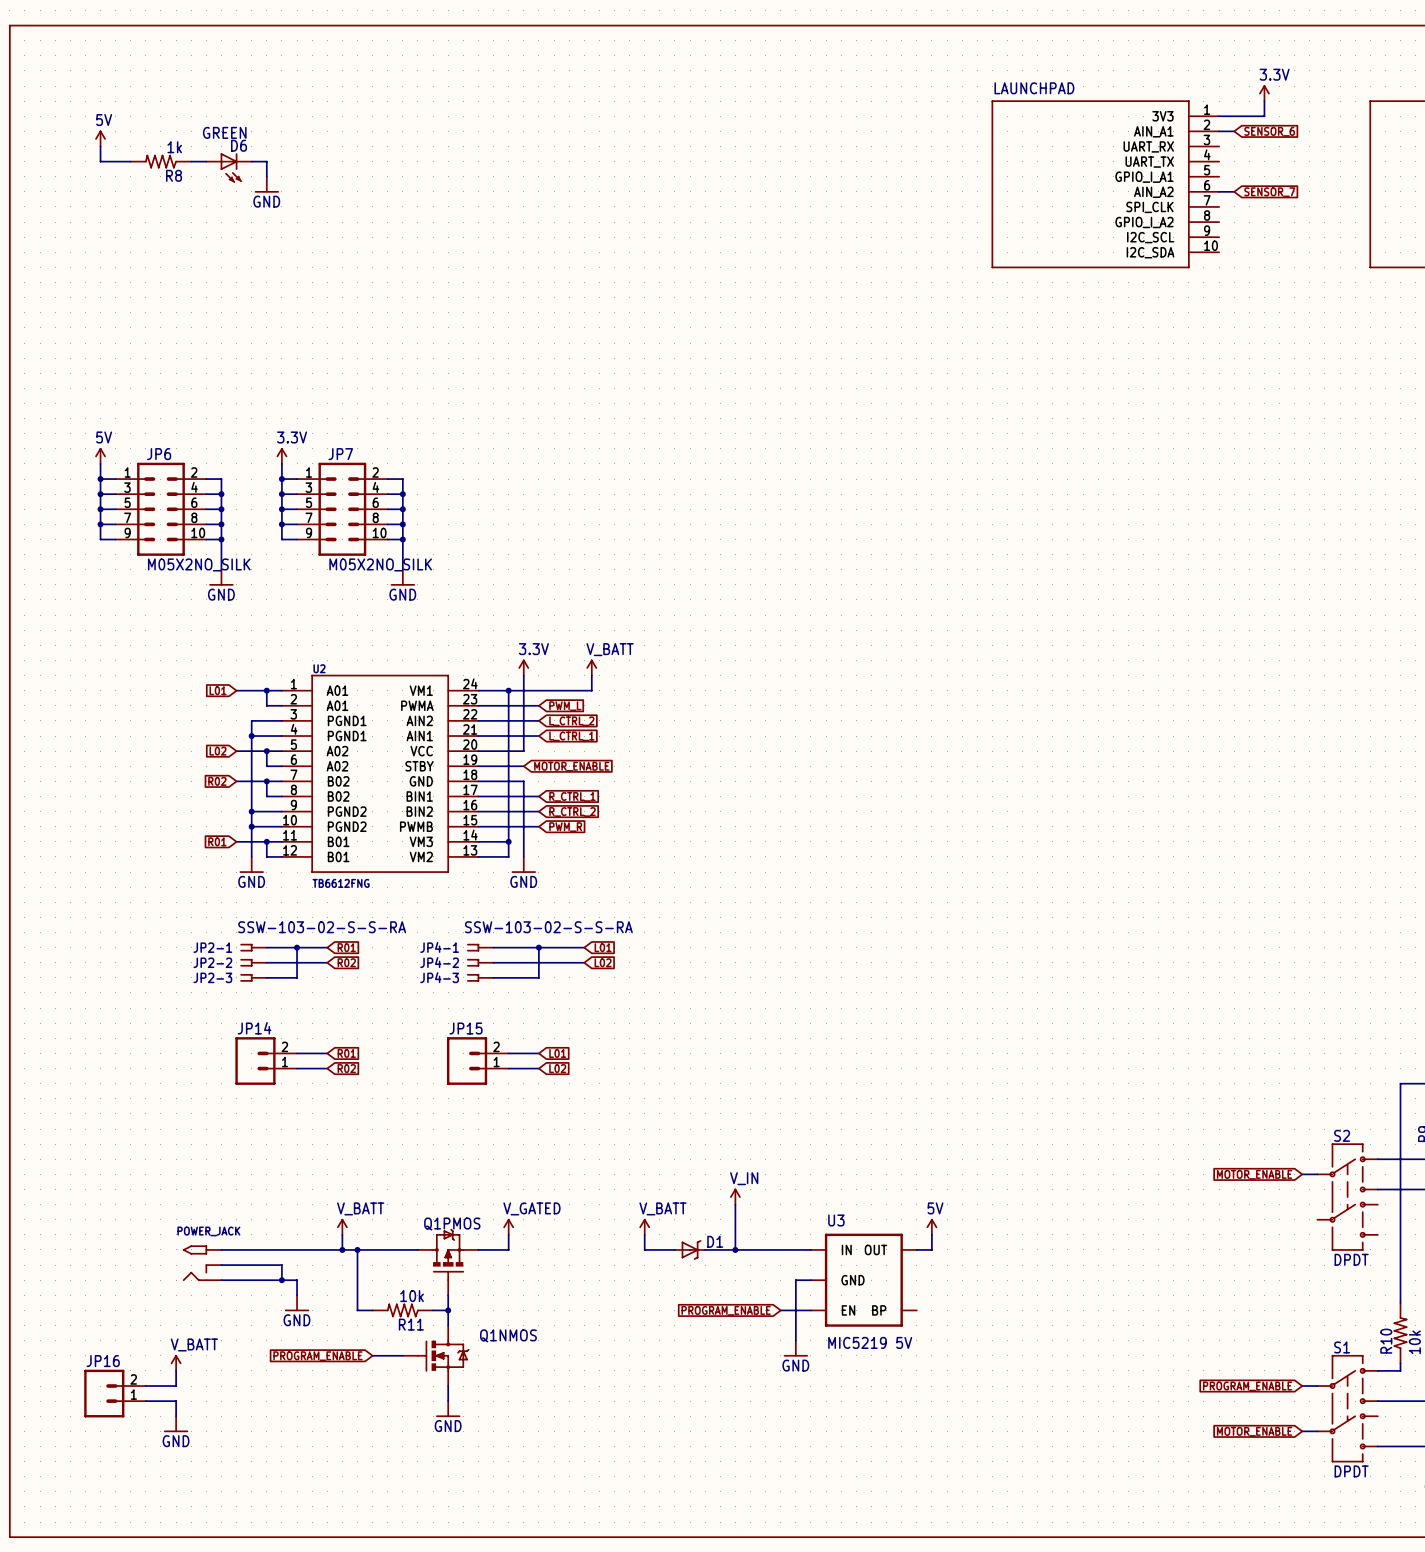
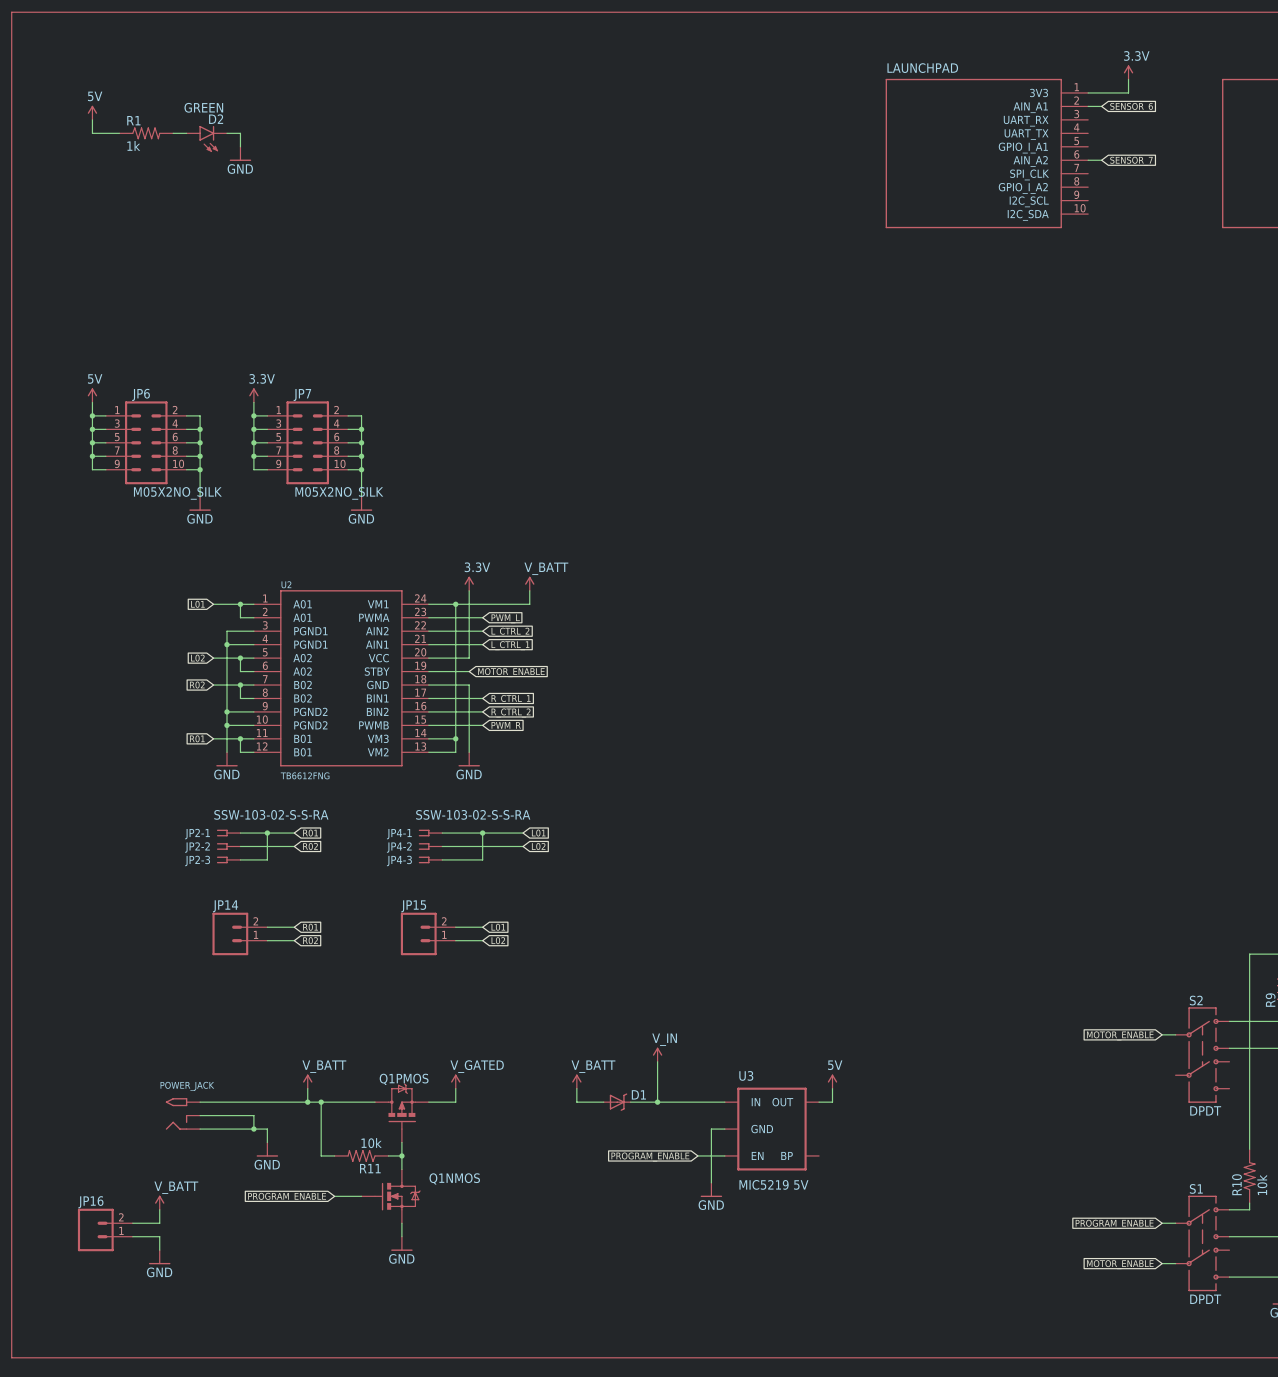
R8: 1k (160, 161) -> none
R1: none -> 1k (146, 133)
D6: GREEN (229, 167) -> none
D2: none -> GREEN (206, 138)

